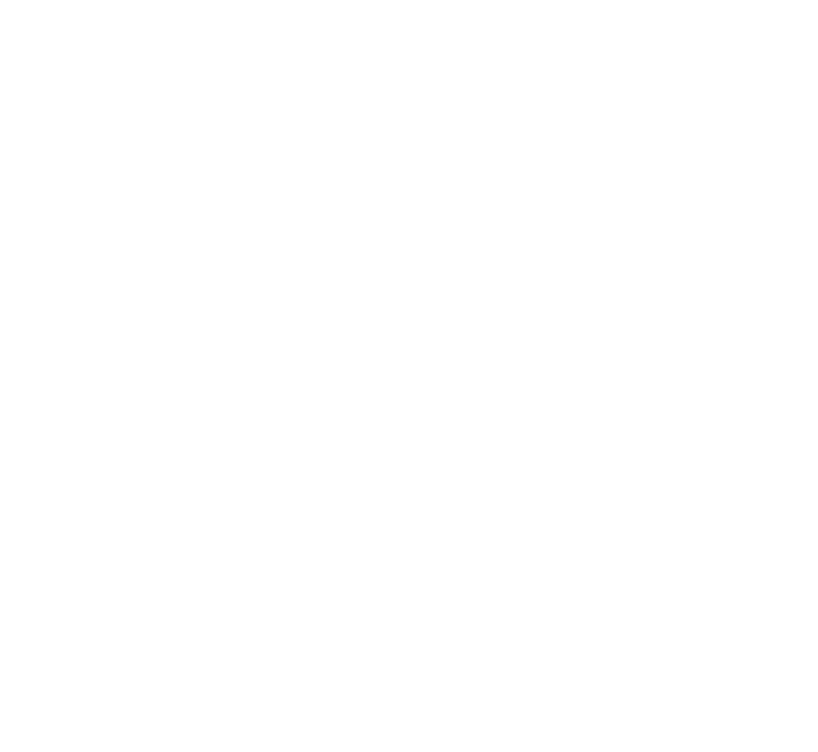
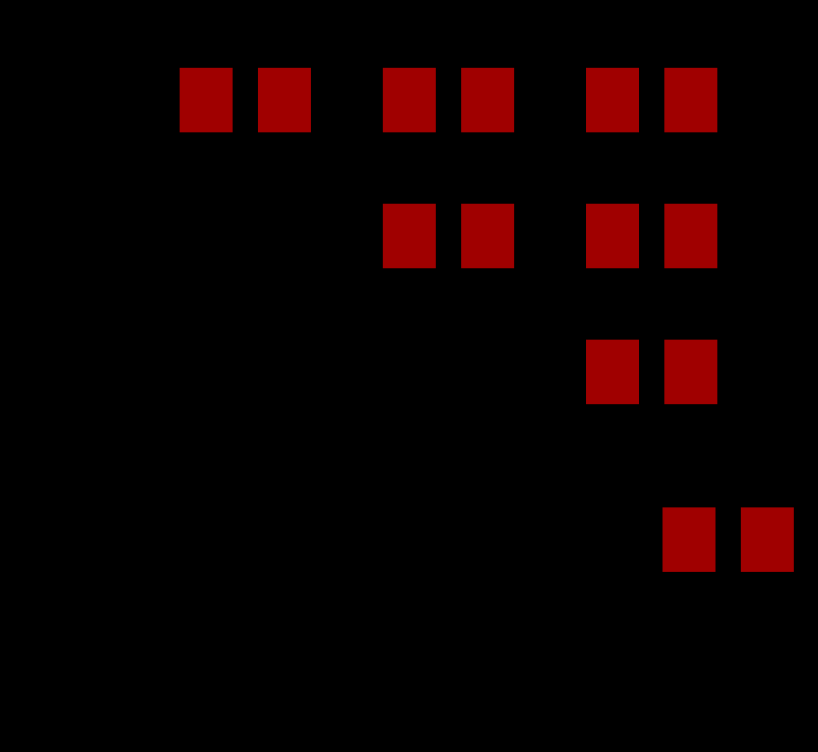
part: none -> (245, 100)
part: none -> (448, 100)
part: none -> (651, 100)
part: none -> (448, 235)
part: none -> (651, 235)
part: none -> (651, 371)
part: none -> (728, 539)

